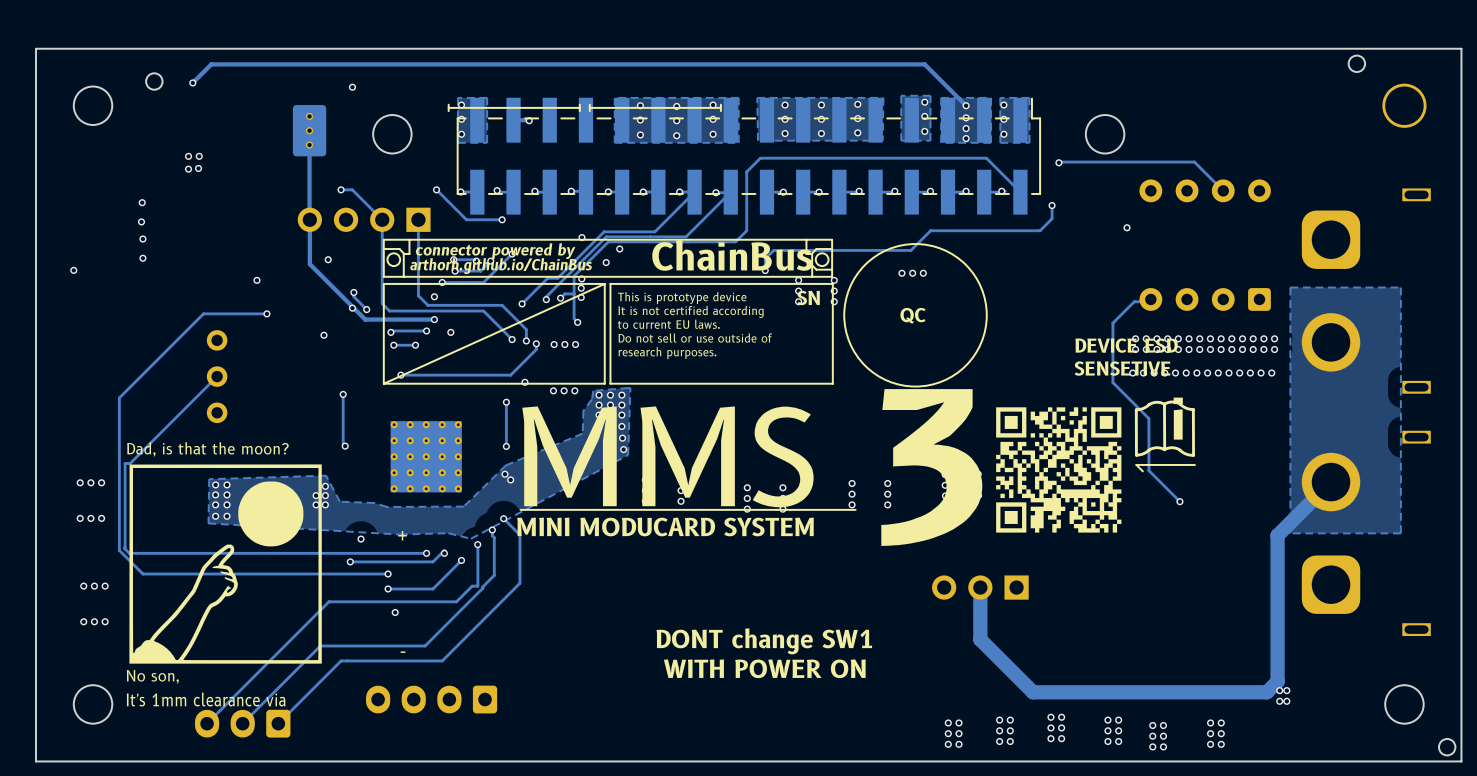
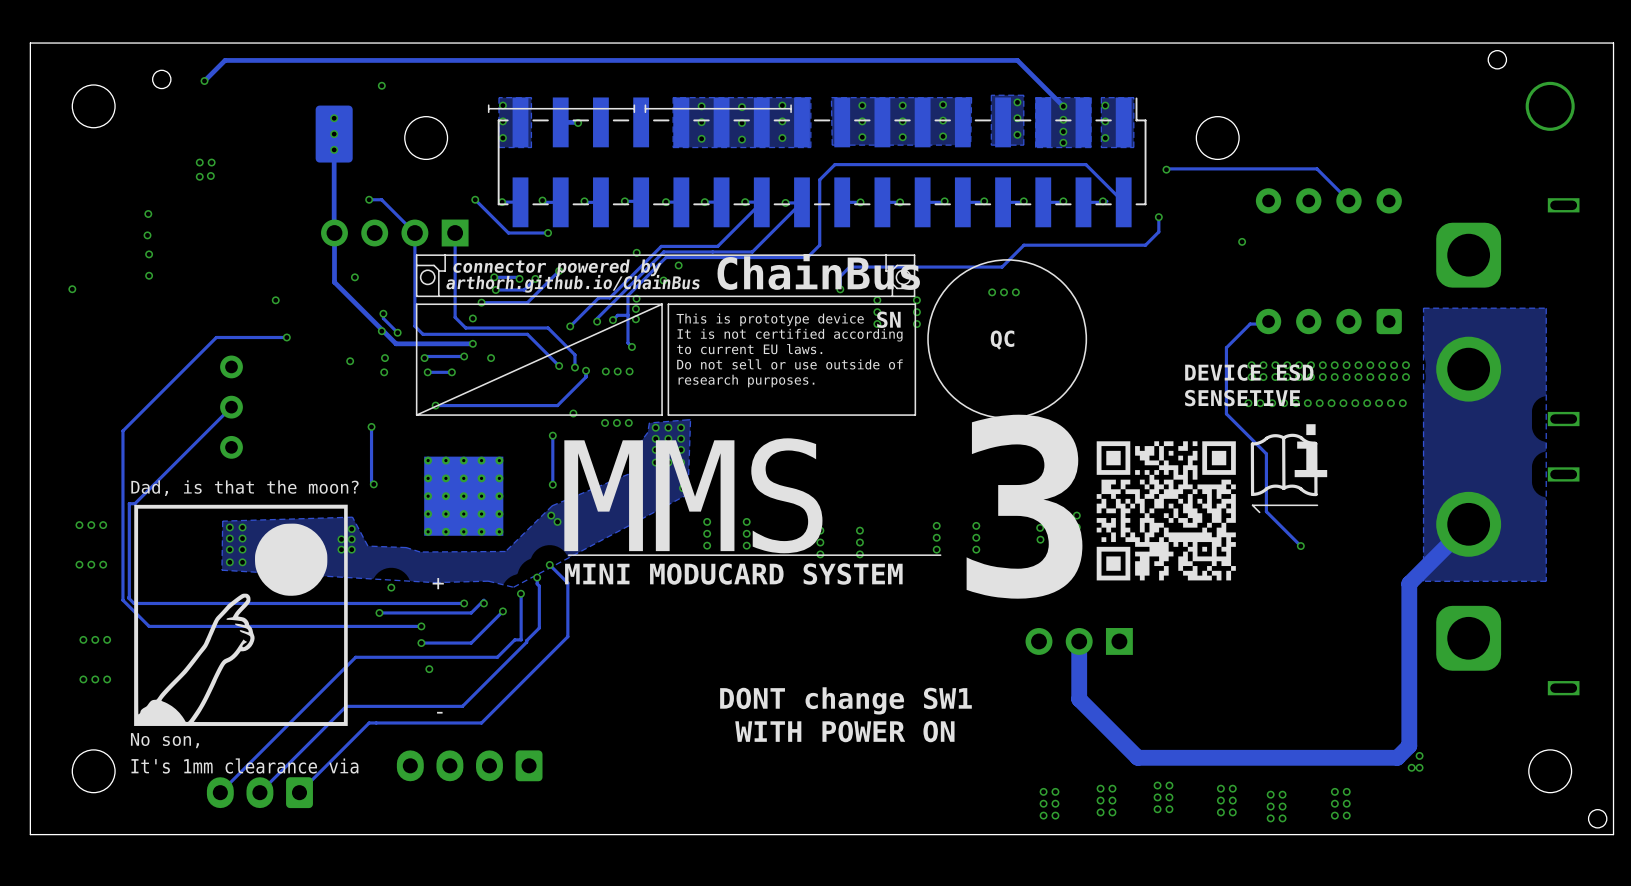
via: none -> (384, 358)
via: none -> (384, 372)
via: (1279, 690) -> none

